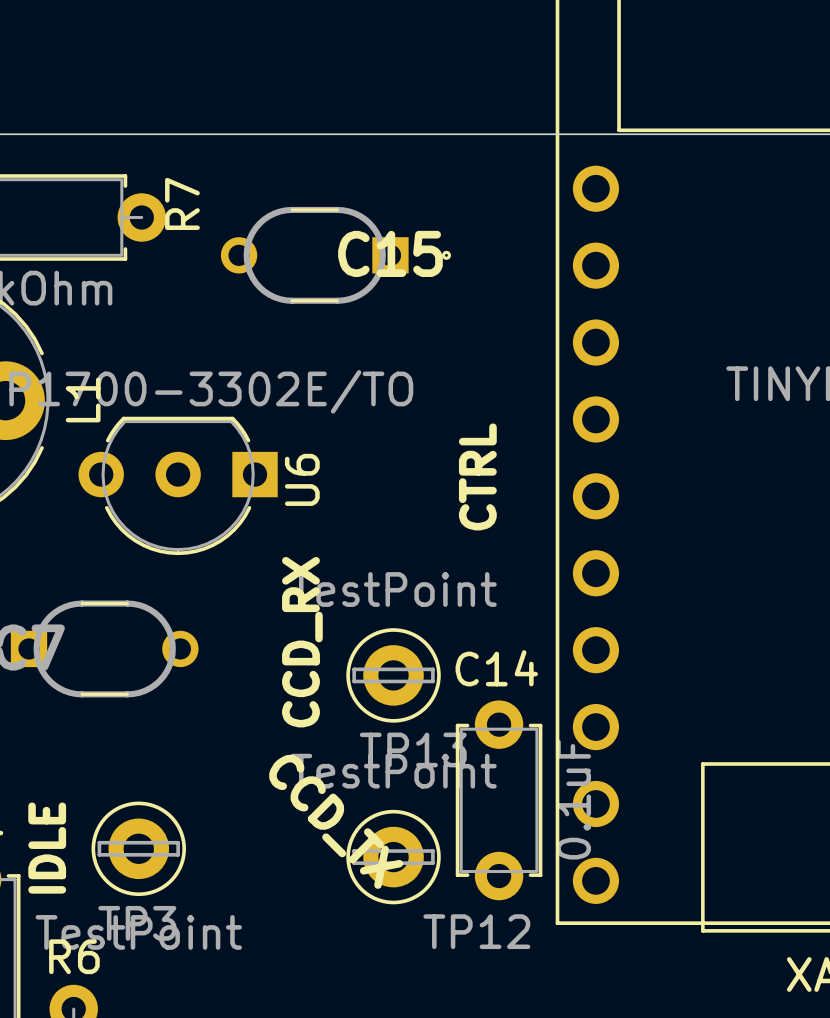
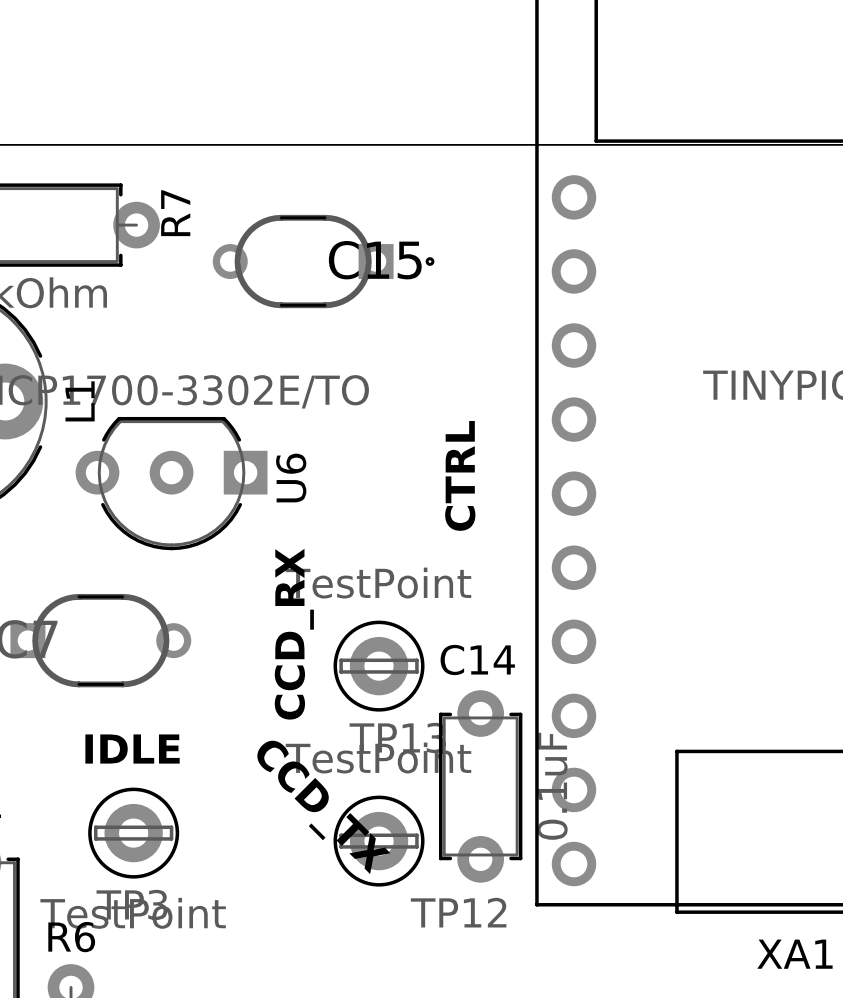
text rotation: 0° (47, 848) -> 90° clockwise (132, 749)

